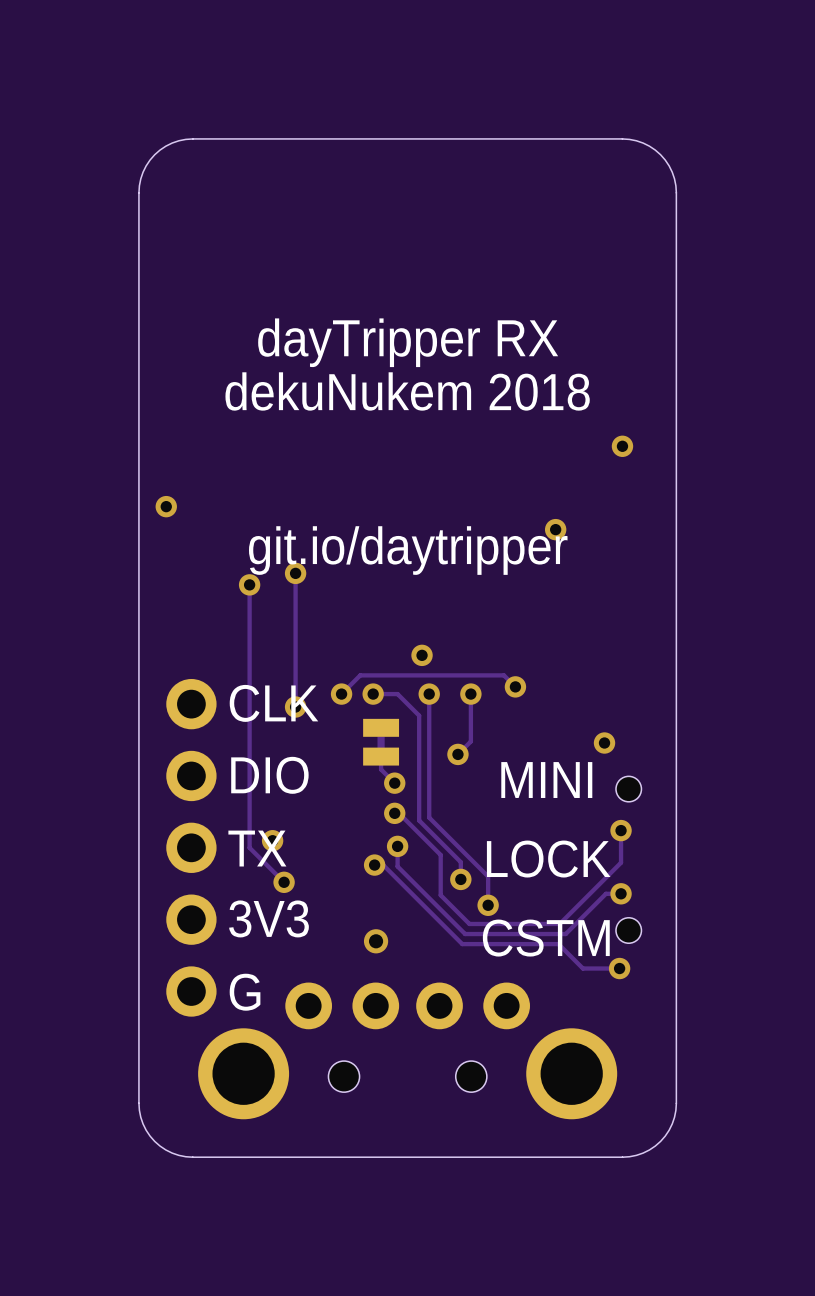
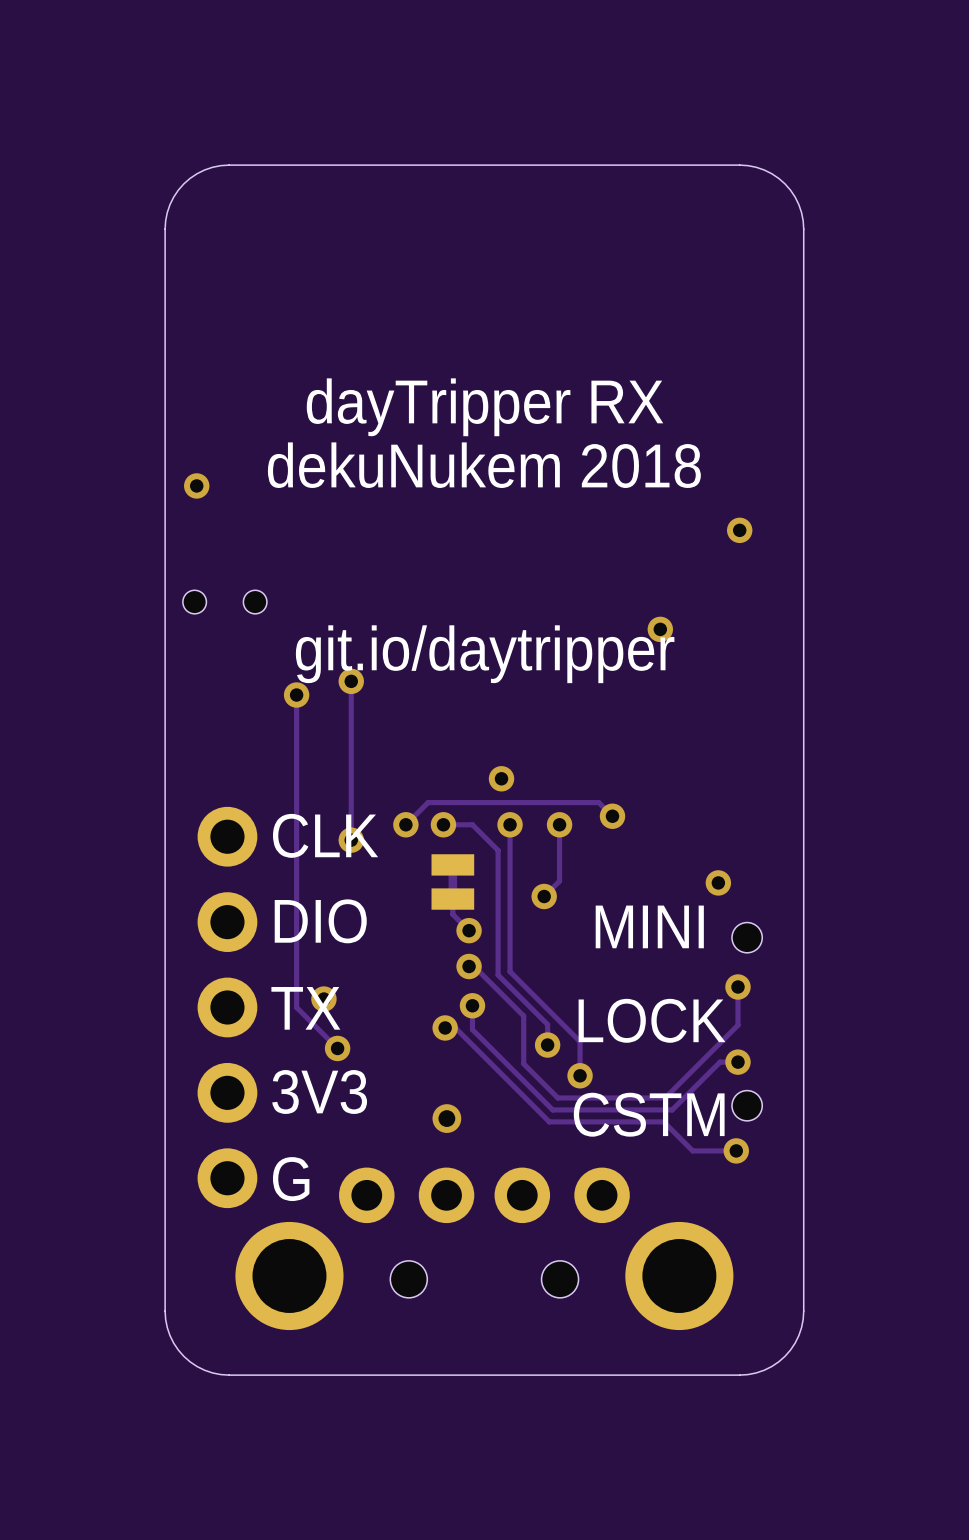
via position: (166, 506) -> (196, 485)
part: none -> (224, 602)

